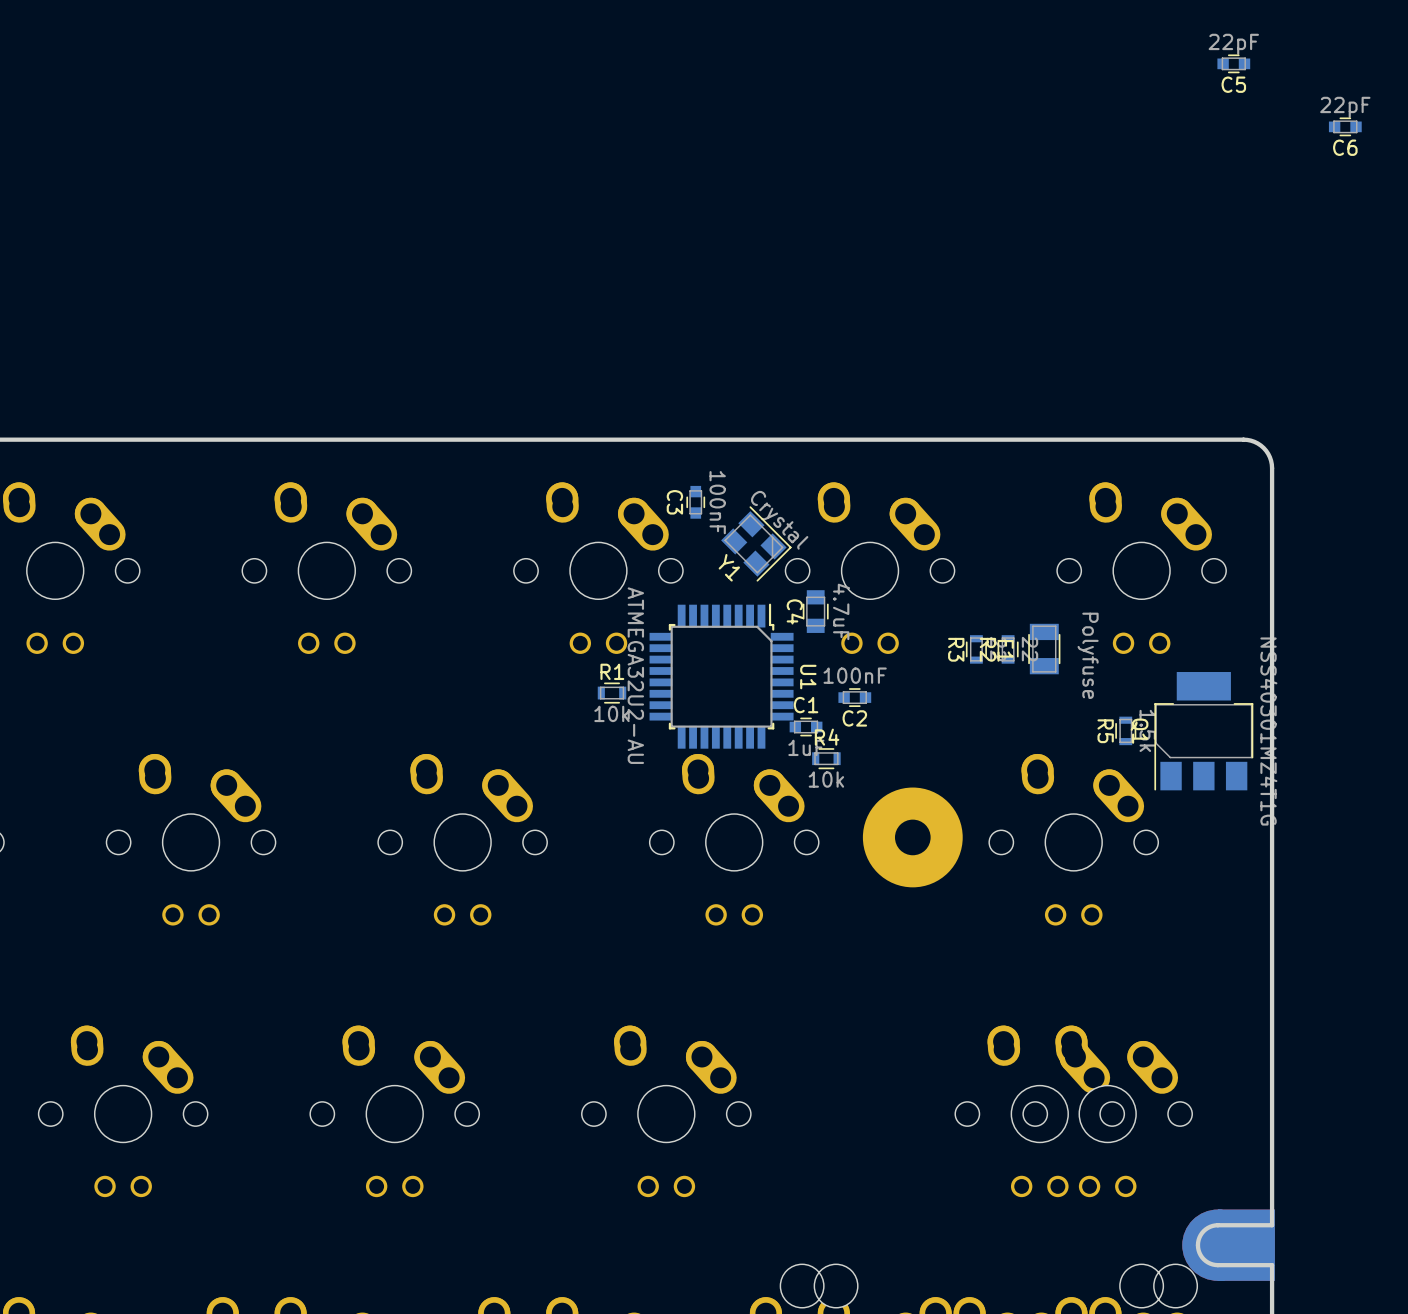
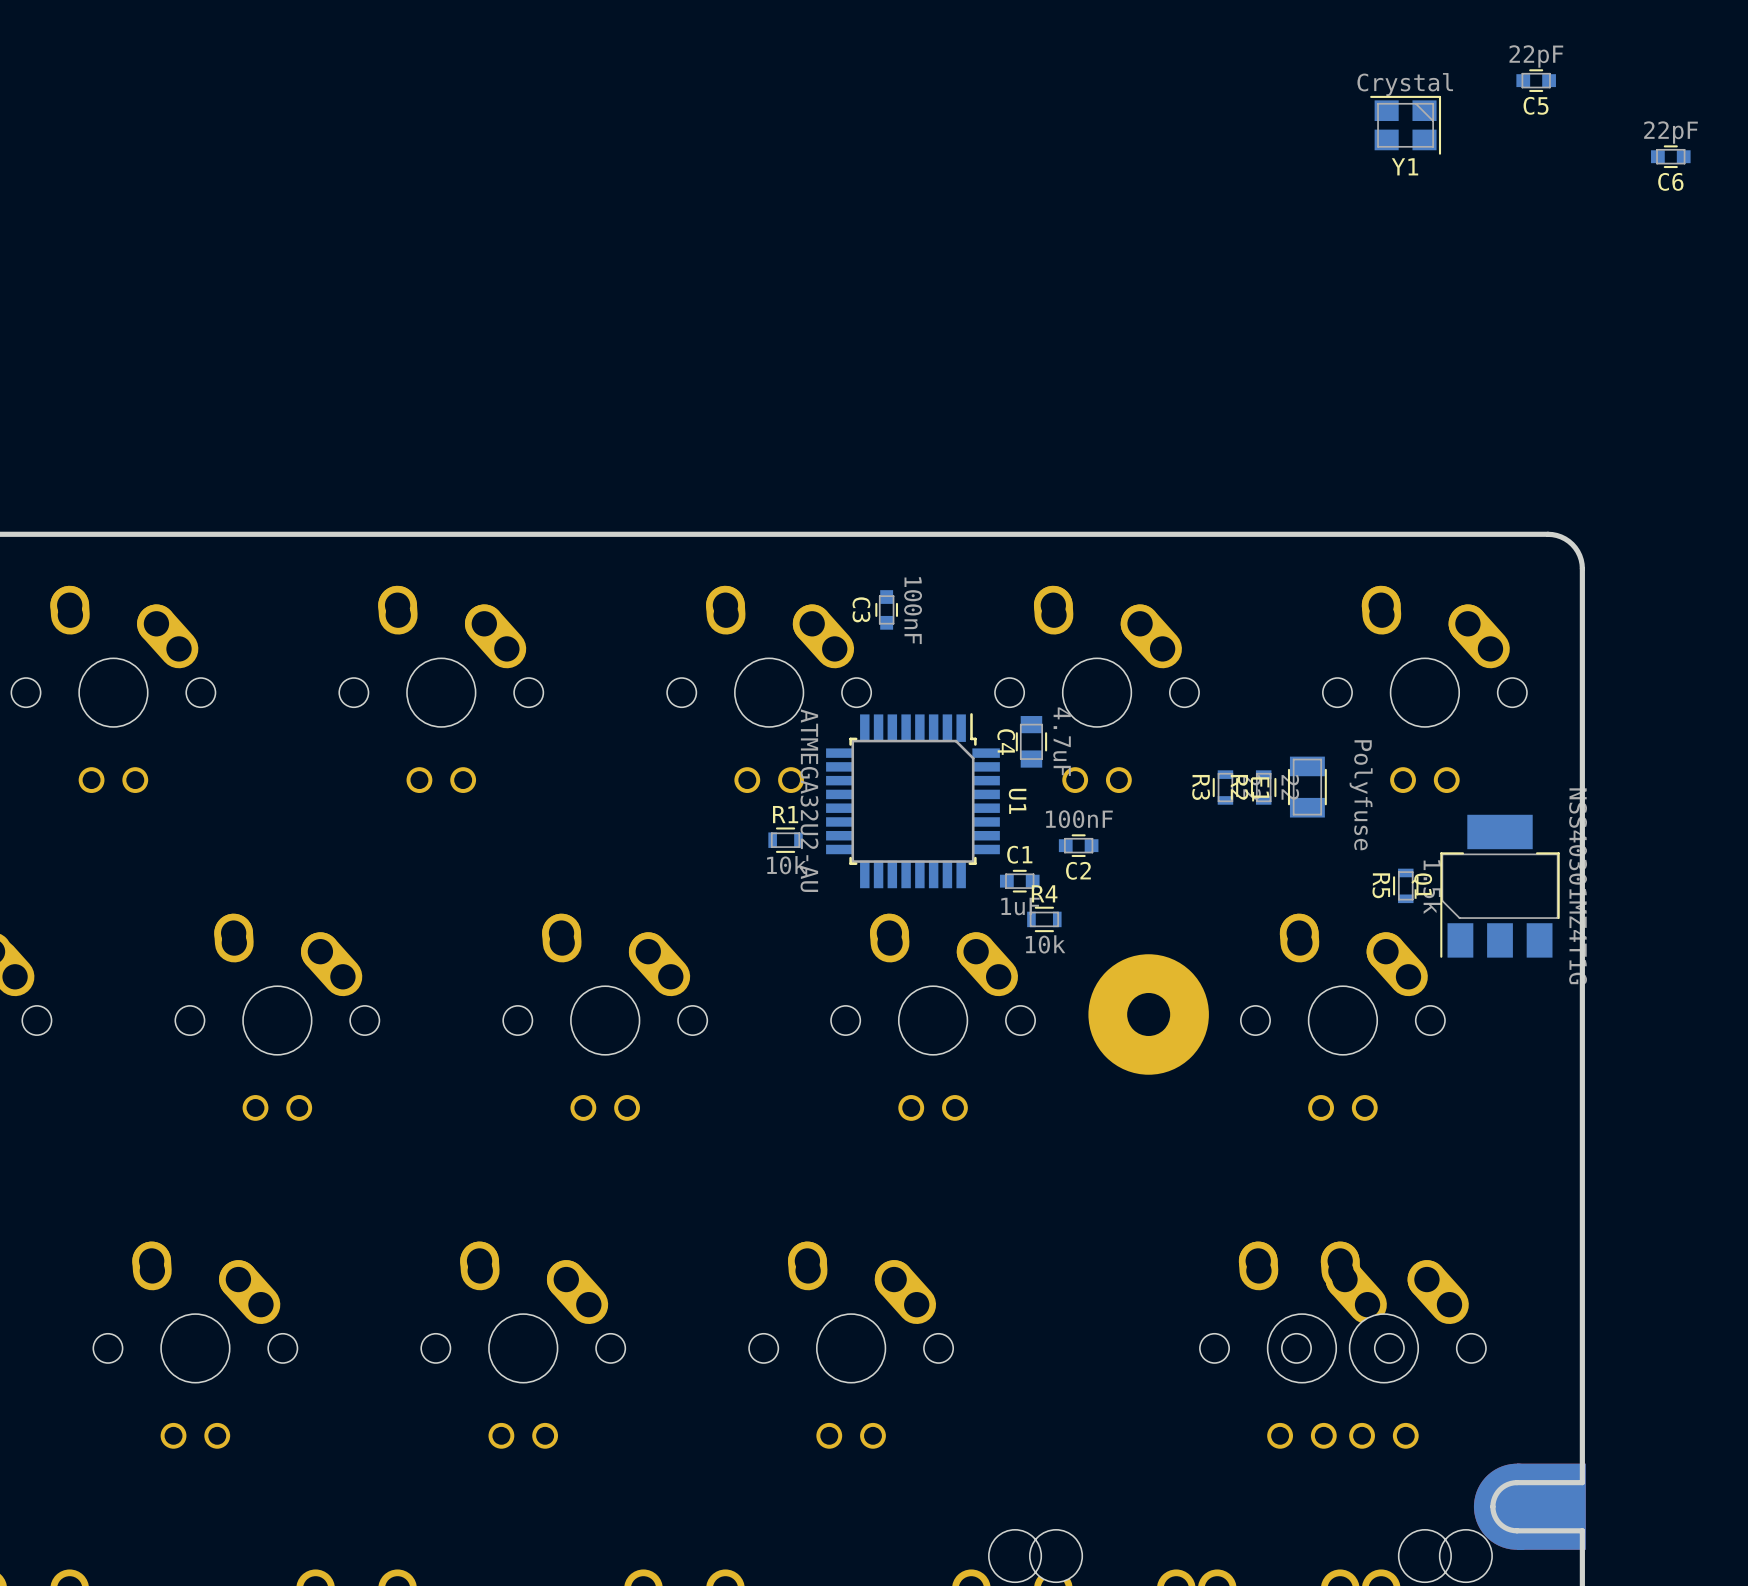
Y1 rotation: 0° (756, 543) -> 45° counterclockwise (1405, 125)
Y1 position: (756, 543) -> (1405, 125)
U1 position: (721, 676) -> (912, 800)

